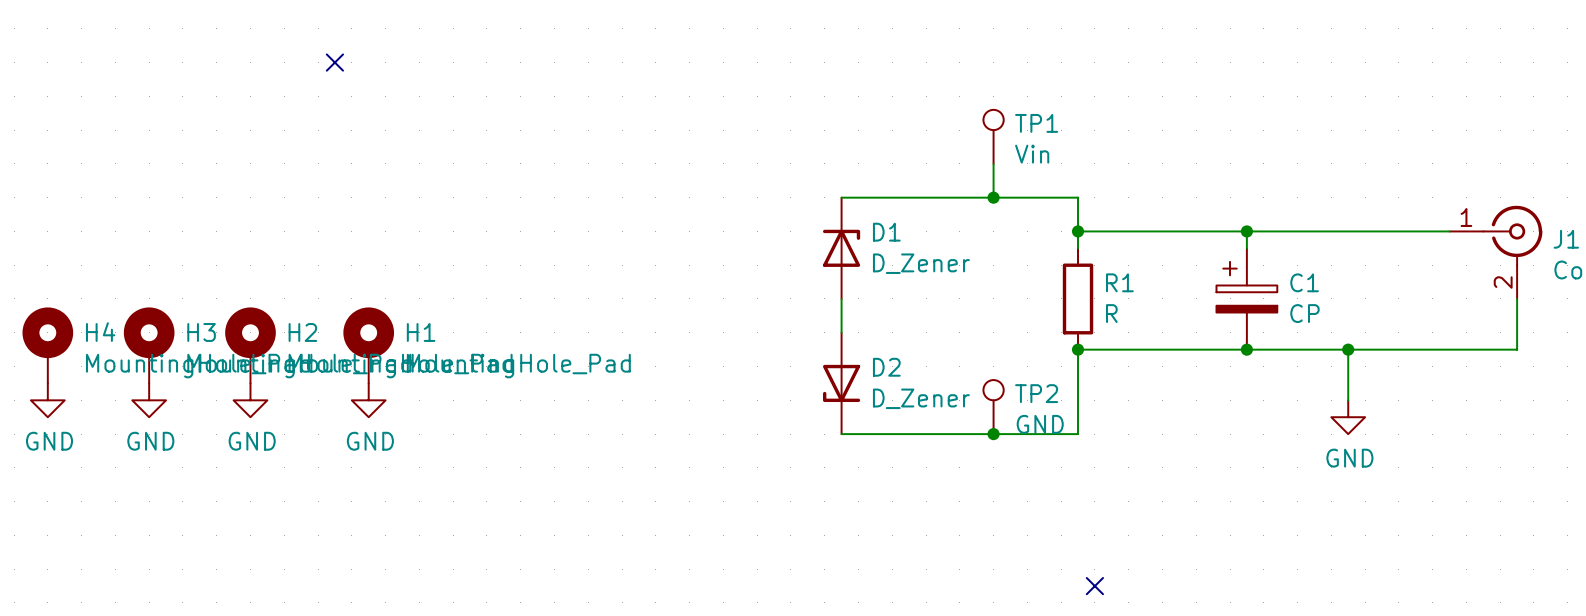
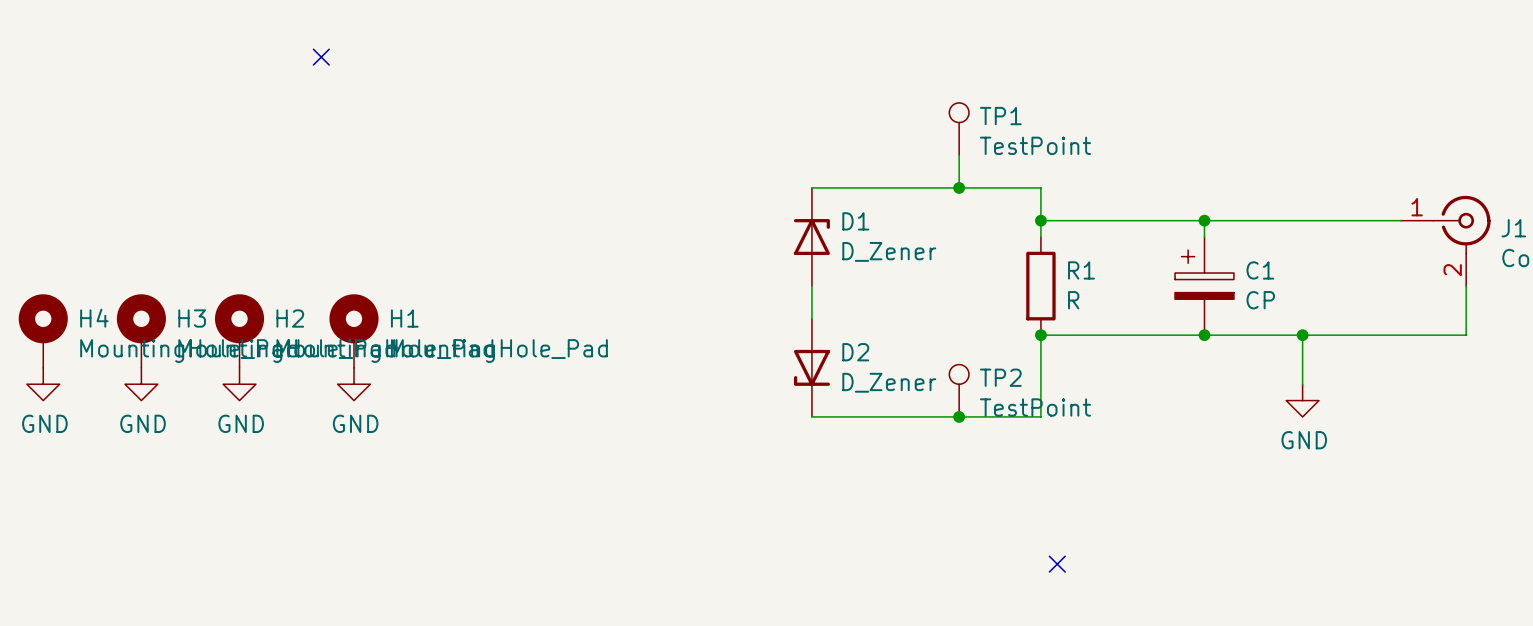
TP1 value: Vin (1032, 154) -> TestPoint (1035, 145)
TP2 value: GND (1040, 424) -> TestPoint (1035, 407)

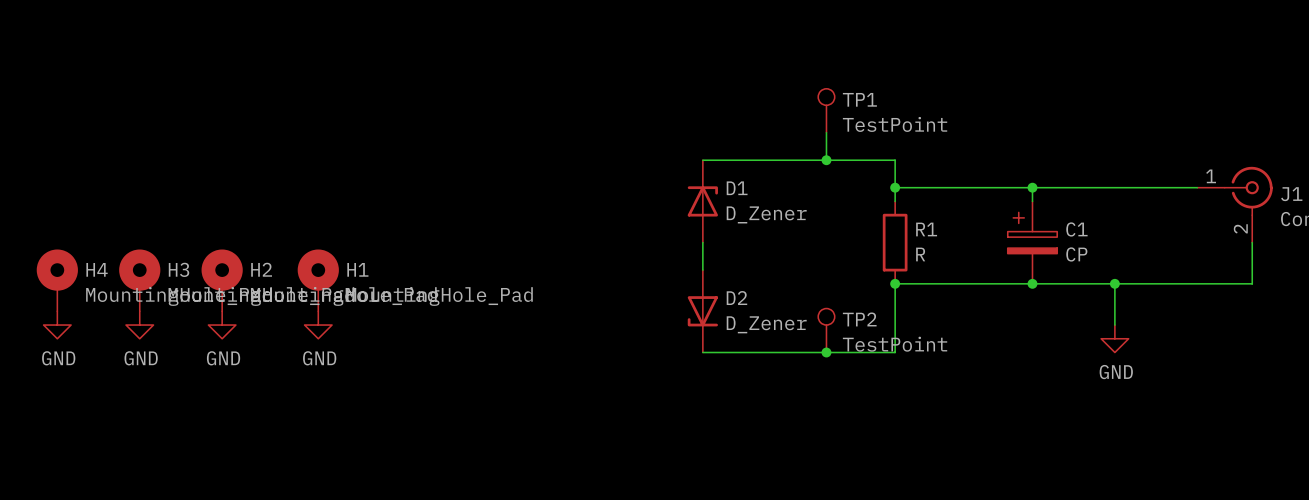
no-connect mark: (321, 57) -> none
no-connect mark: (1057, 564) -> none

